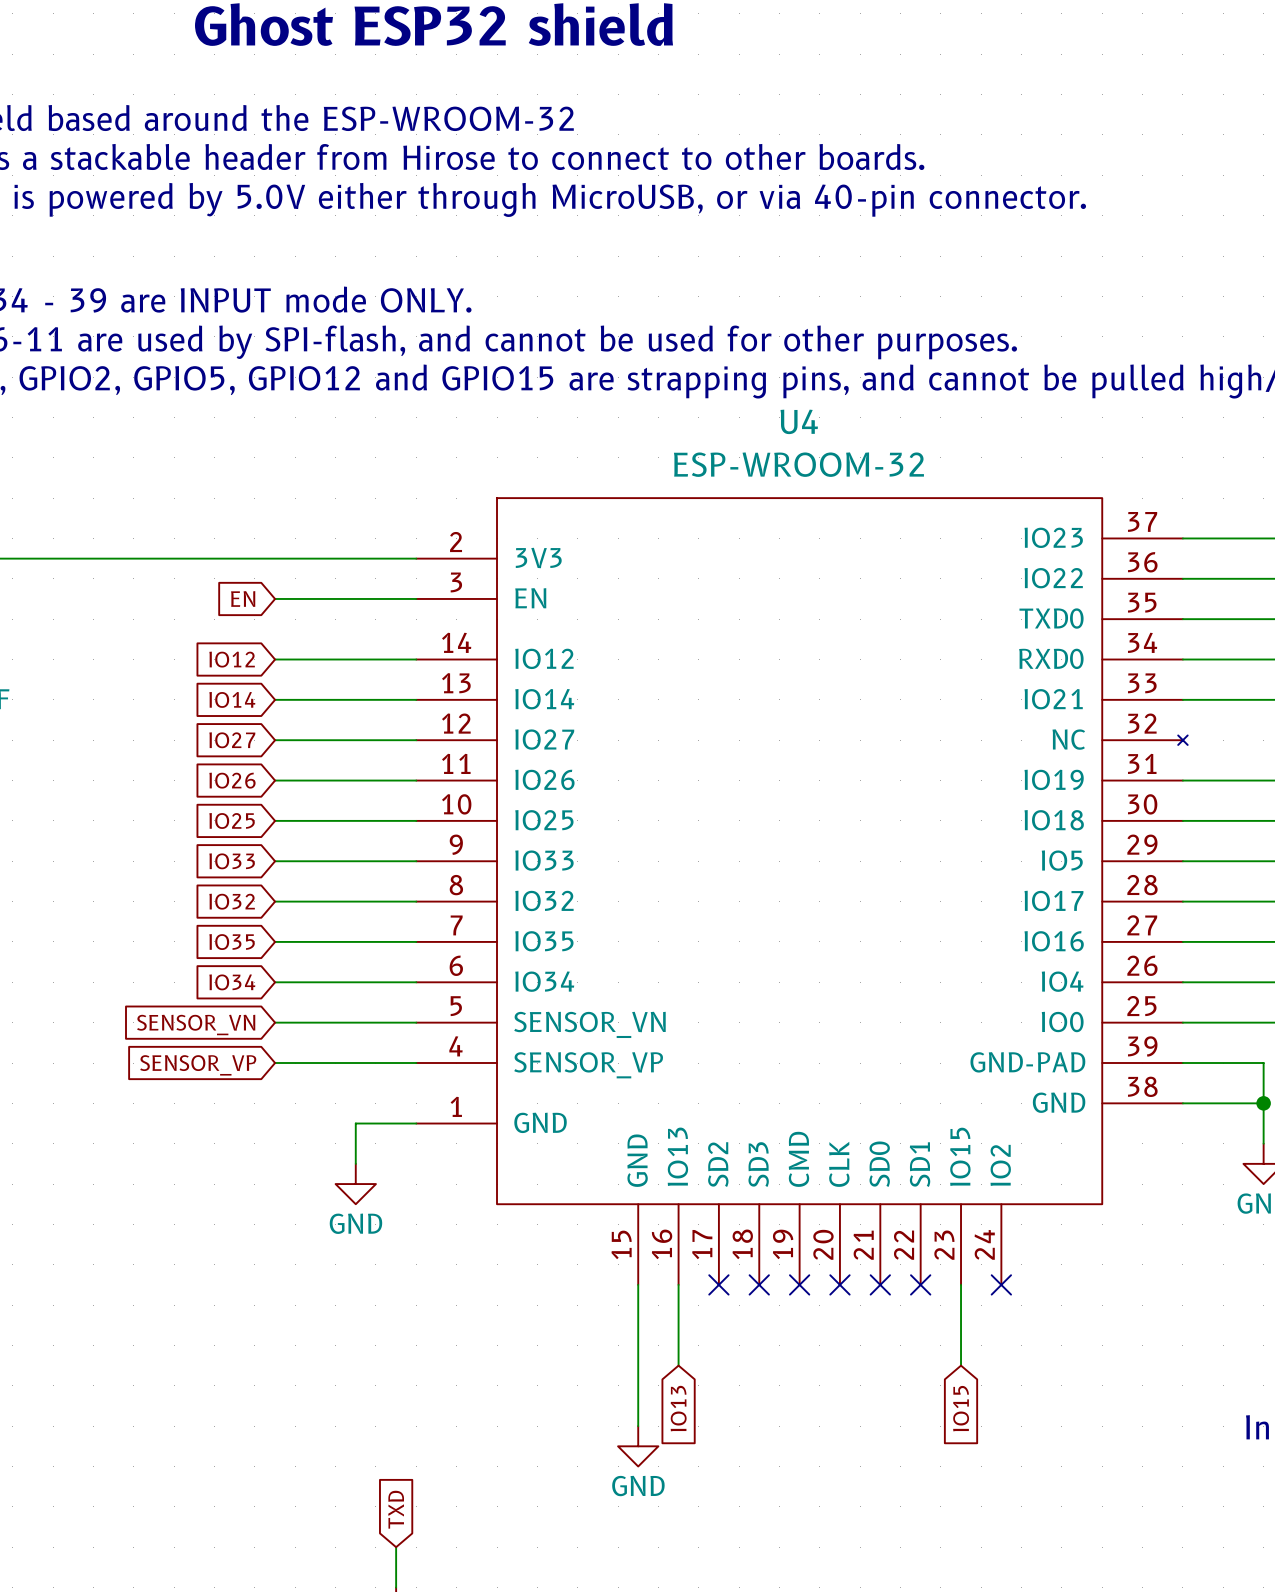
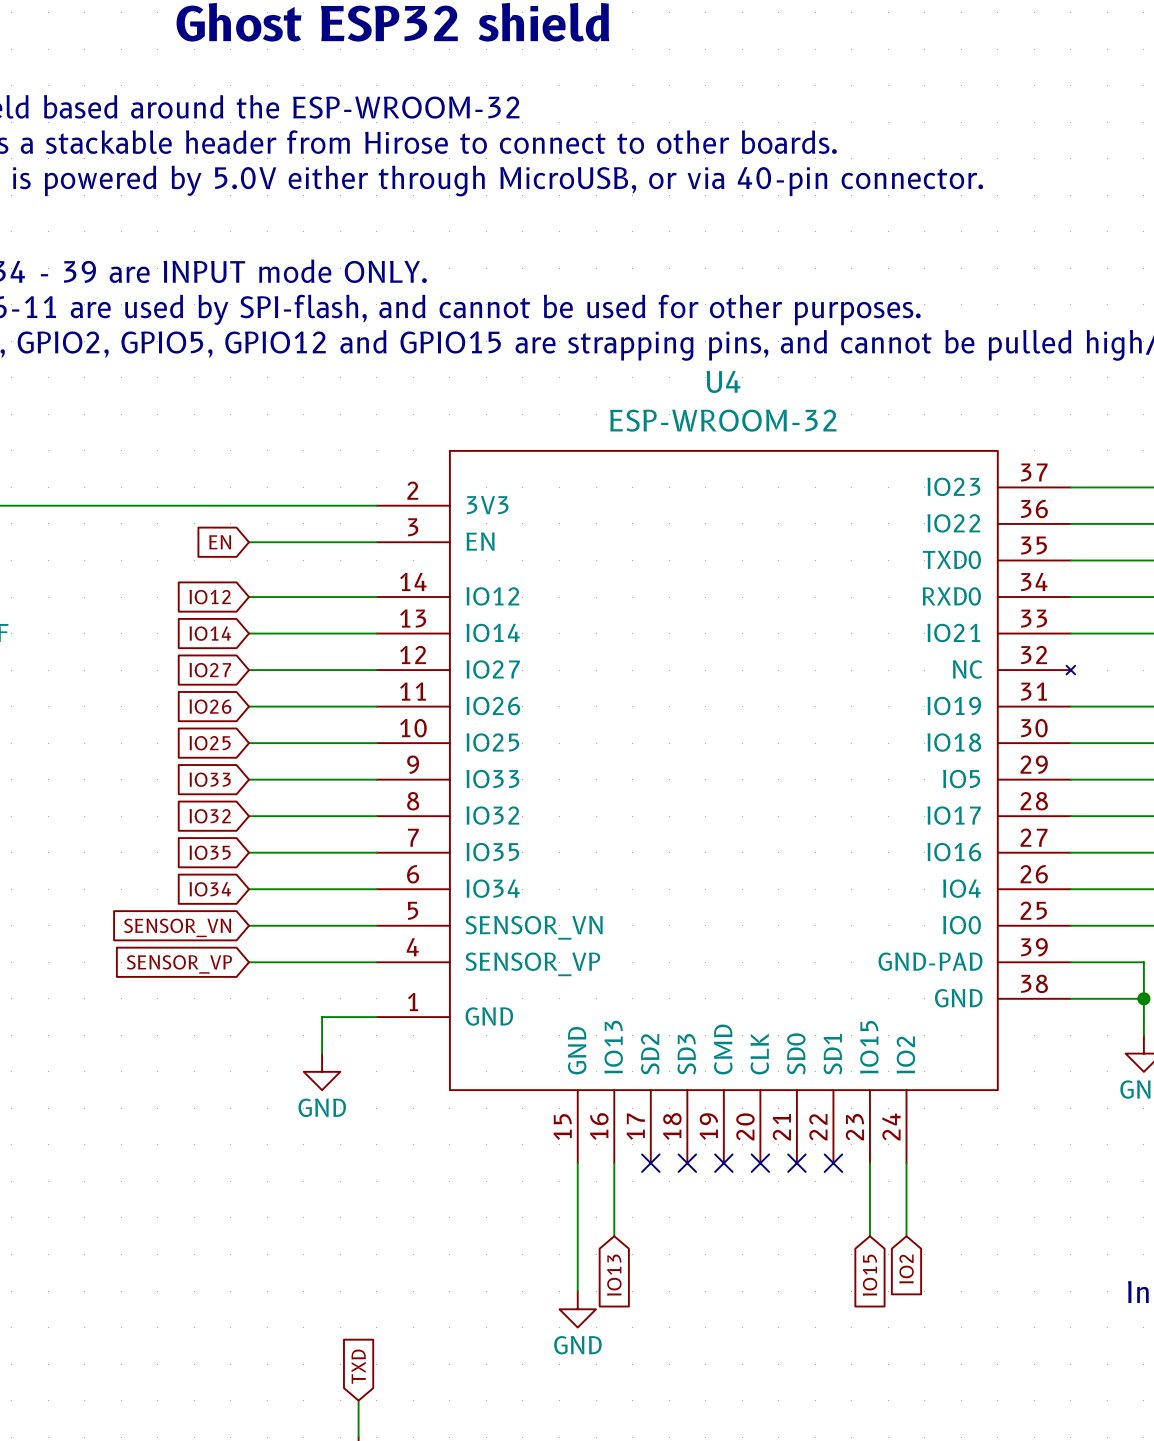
wire: none -> (906, 1163) (906, 1236)
no-connect mark: (1001, 1284) -> none
global label: none -> IO2 (906, 1269)

